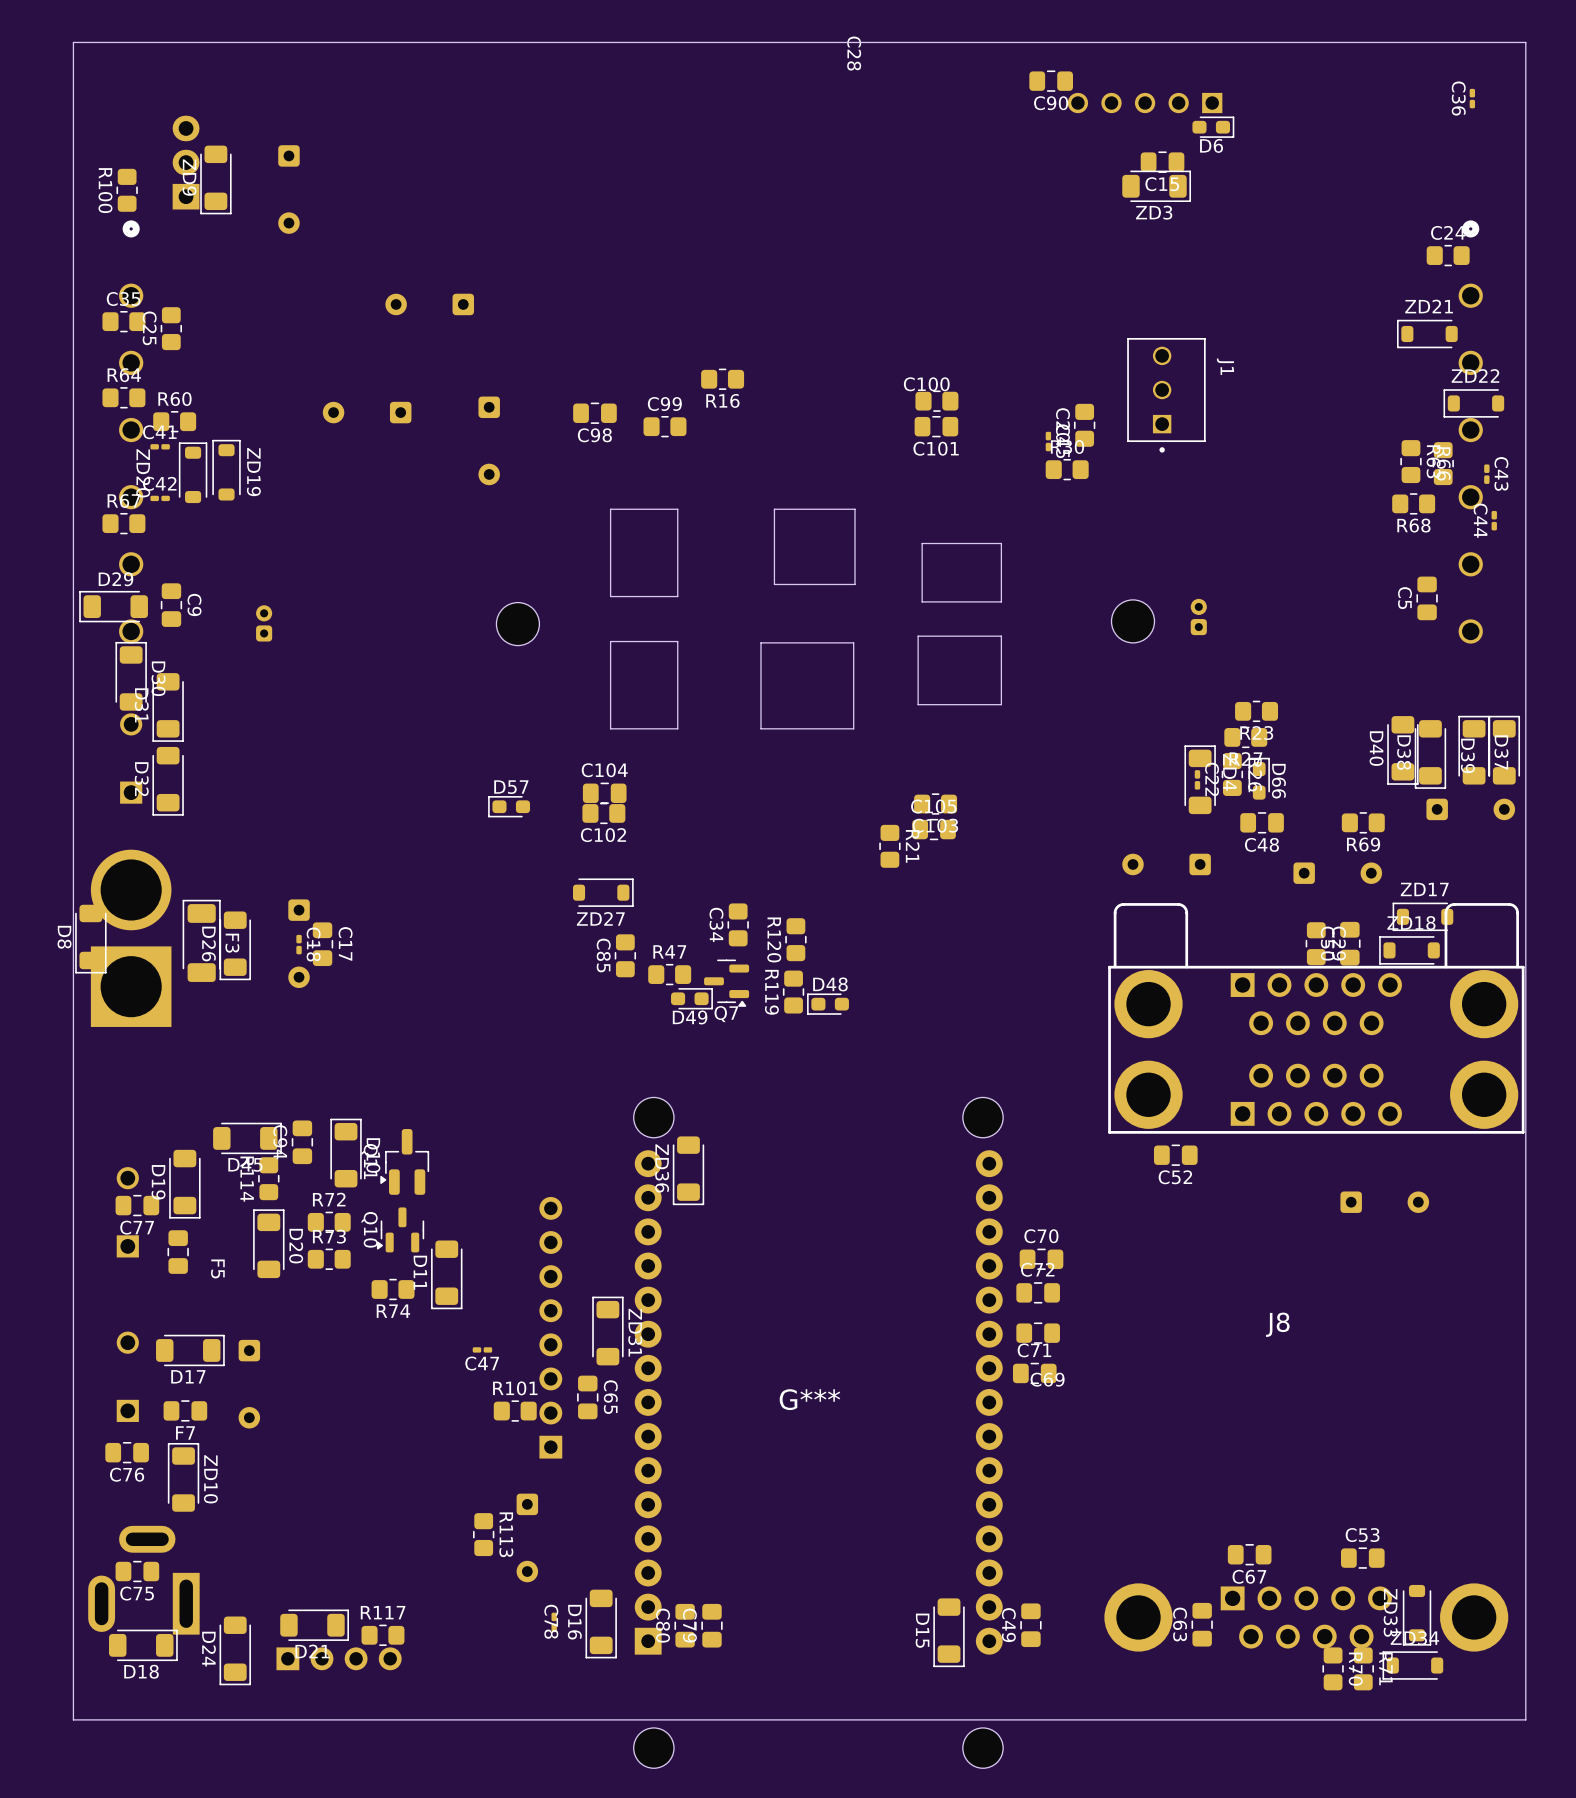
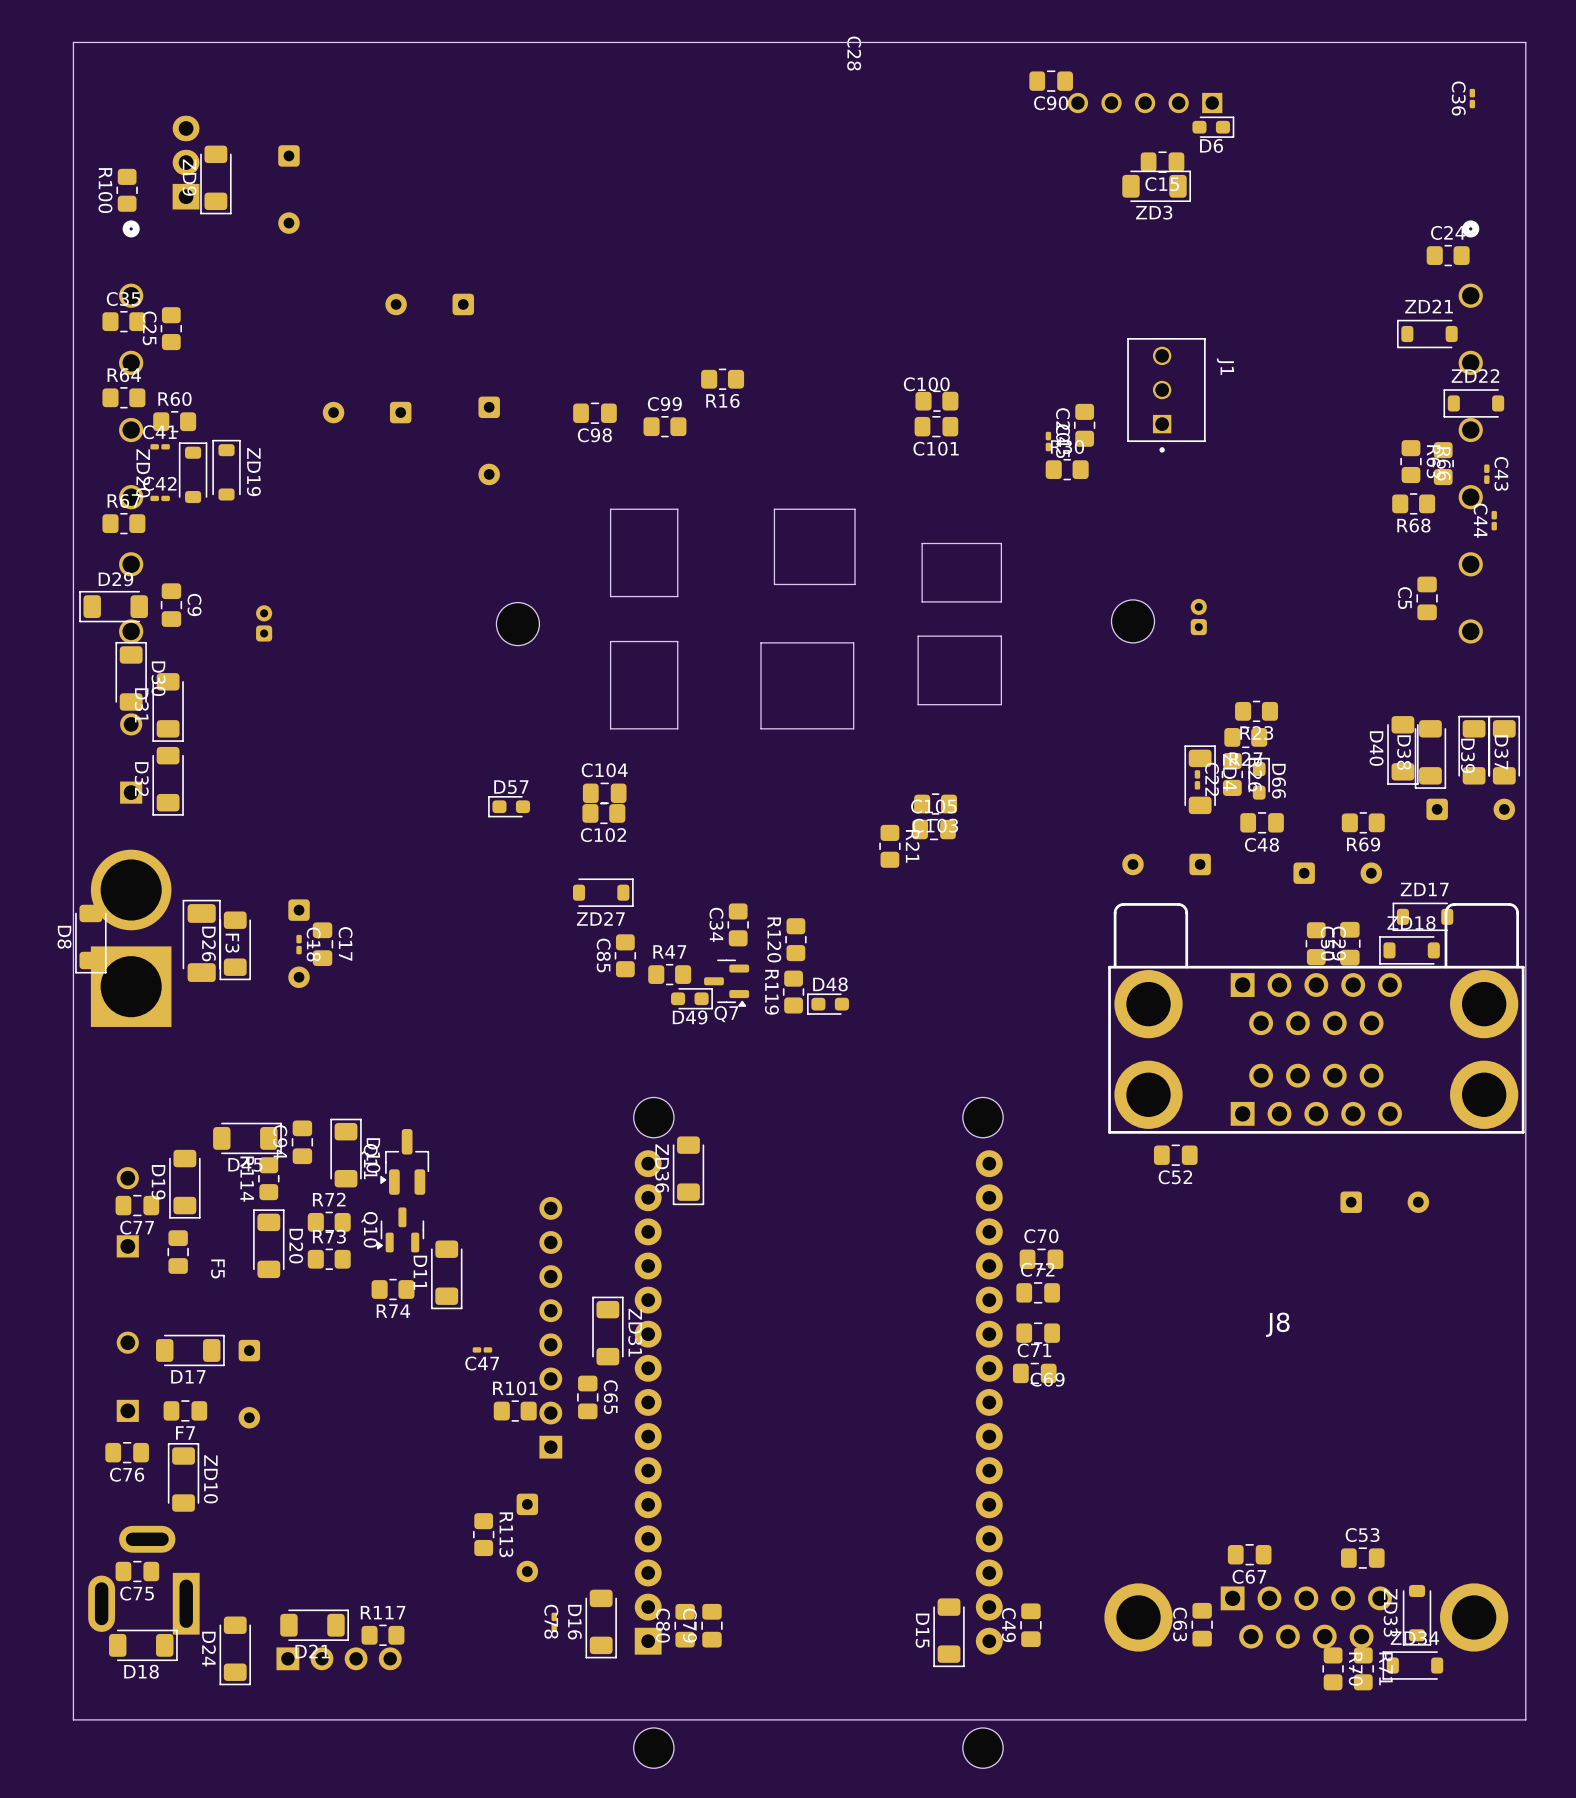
G***: (809, 1399) -> none

